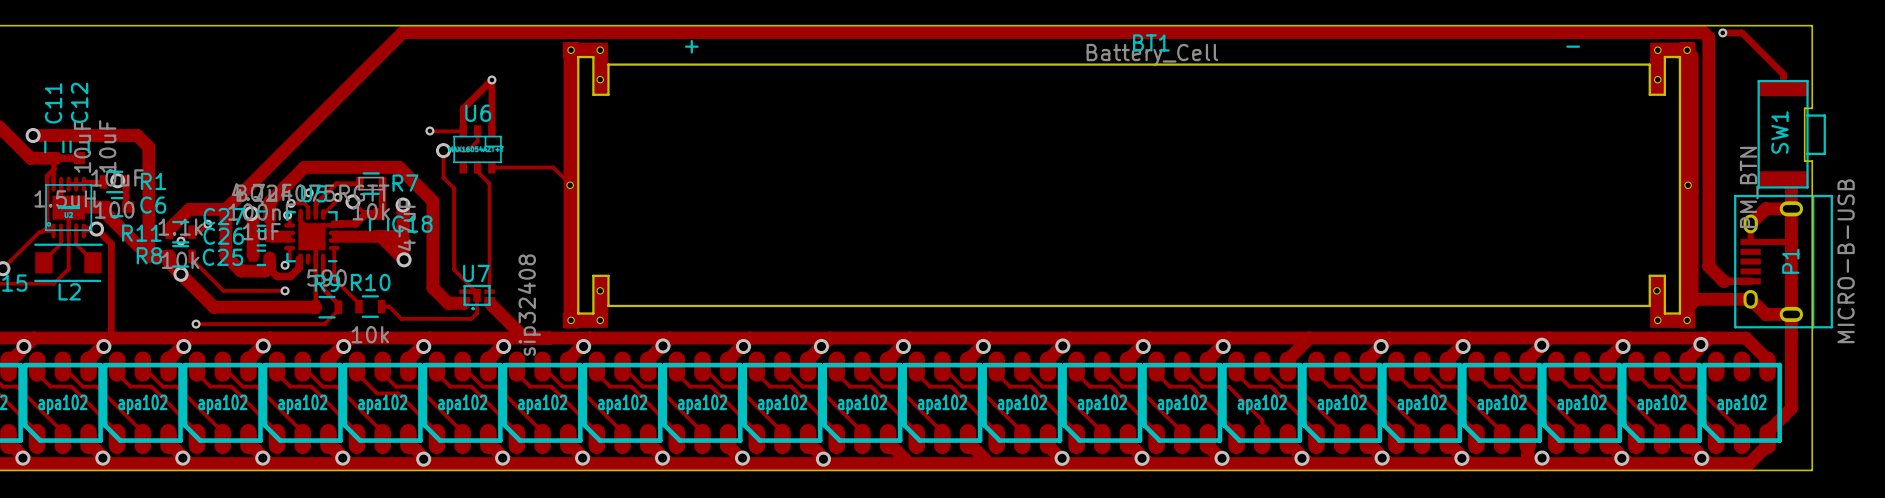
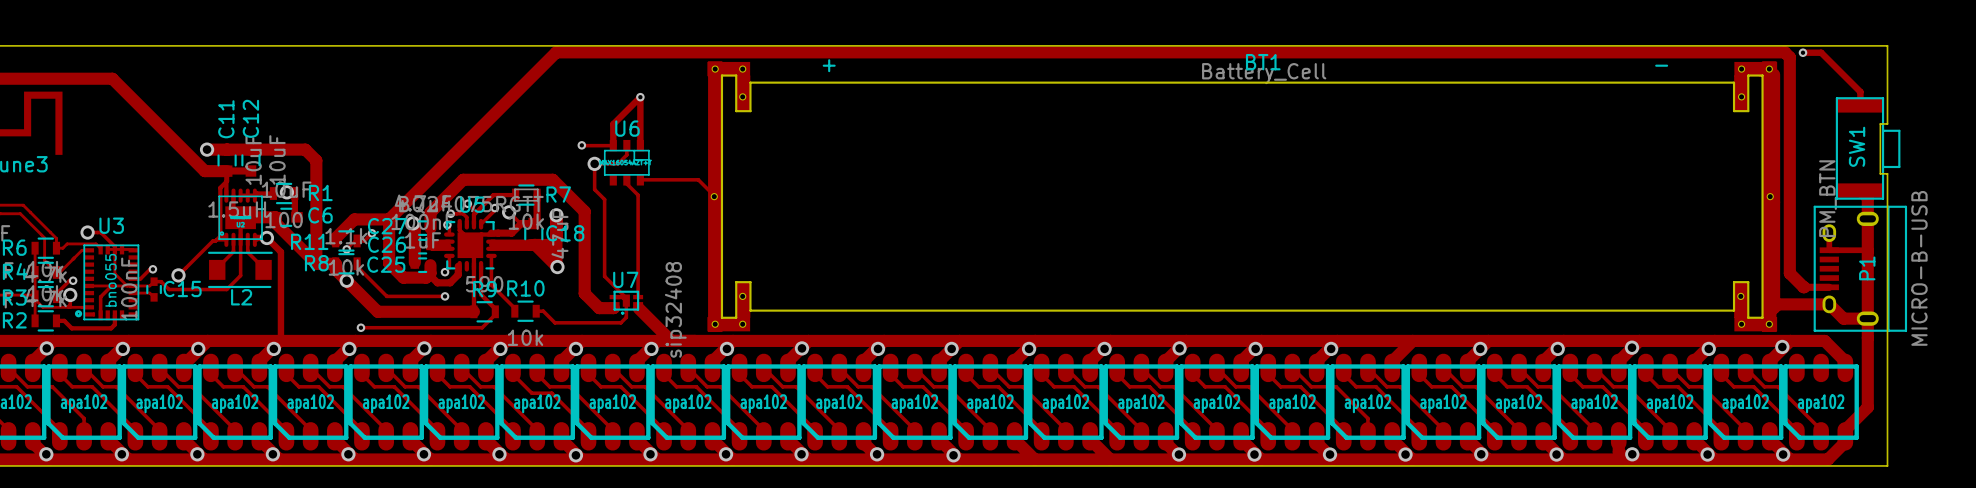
track: (1791, 208) (1765, 208) (1750, 223) -> none

